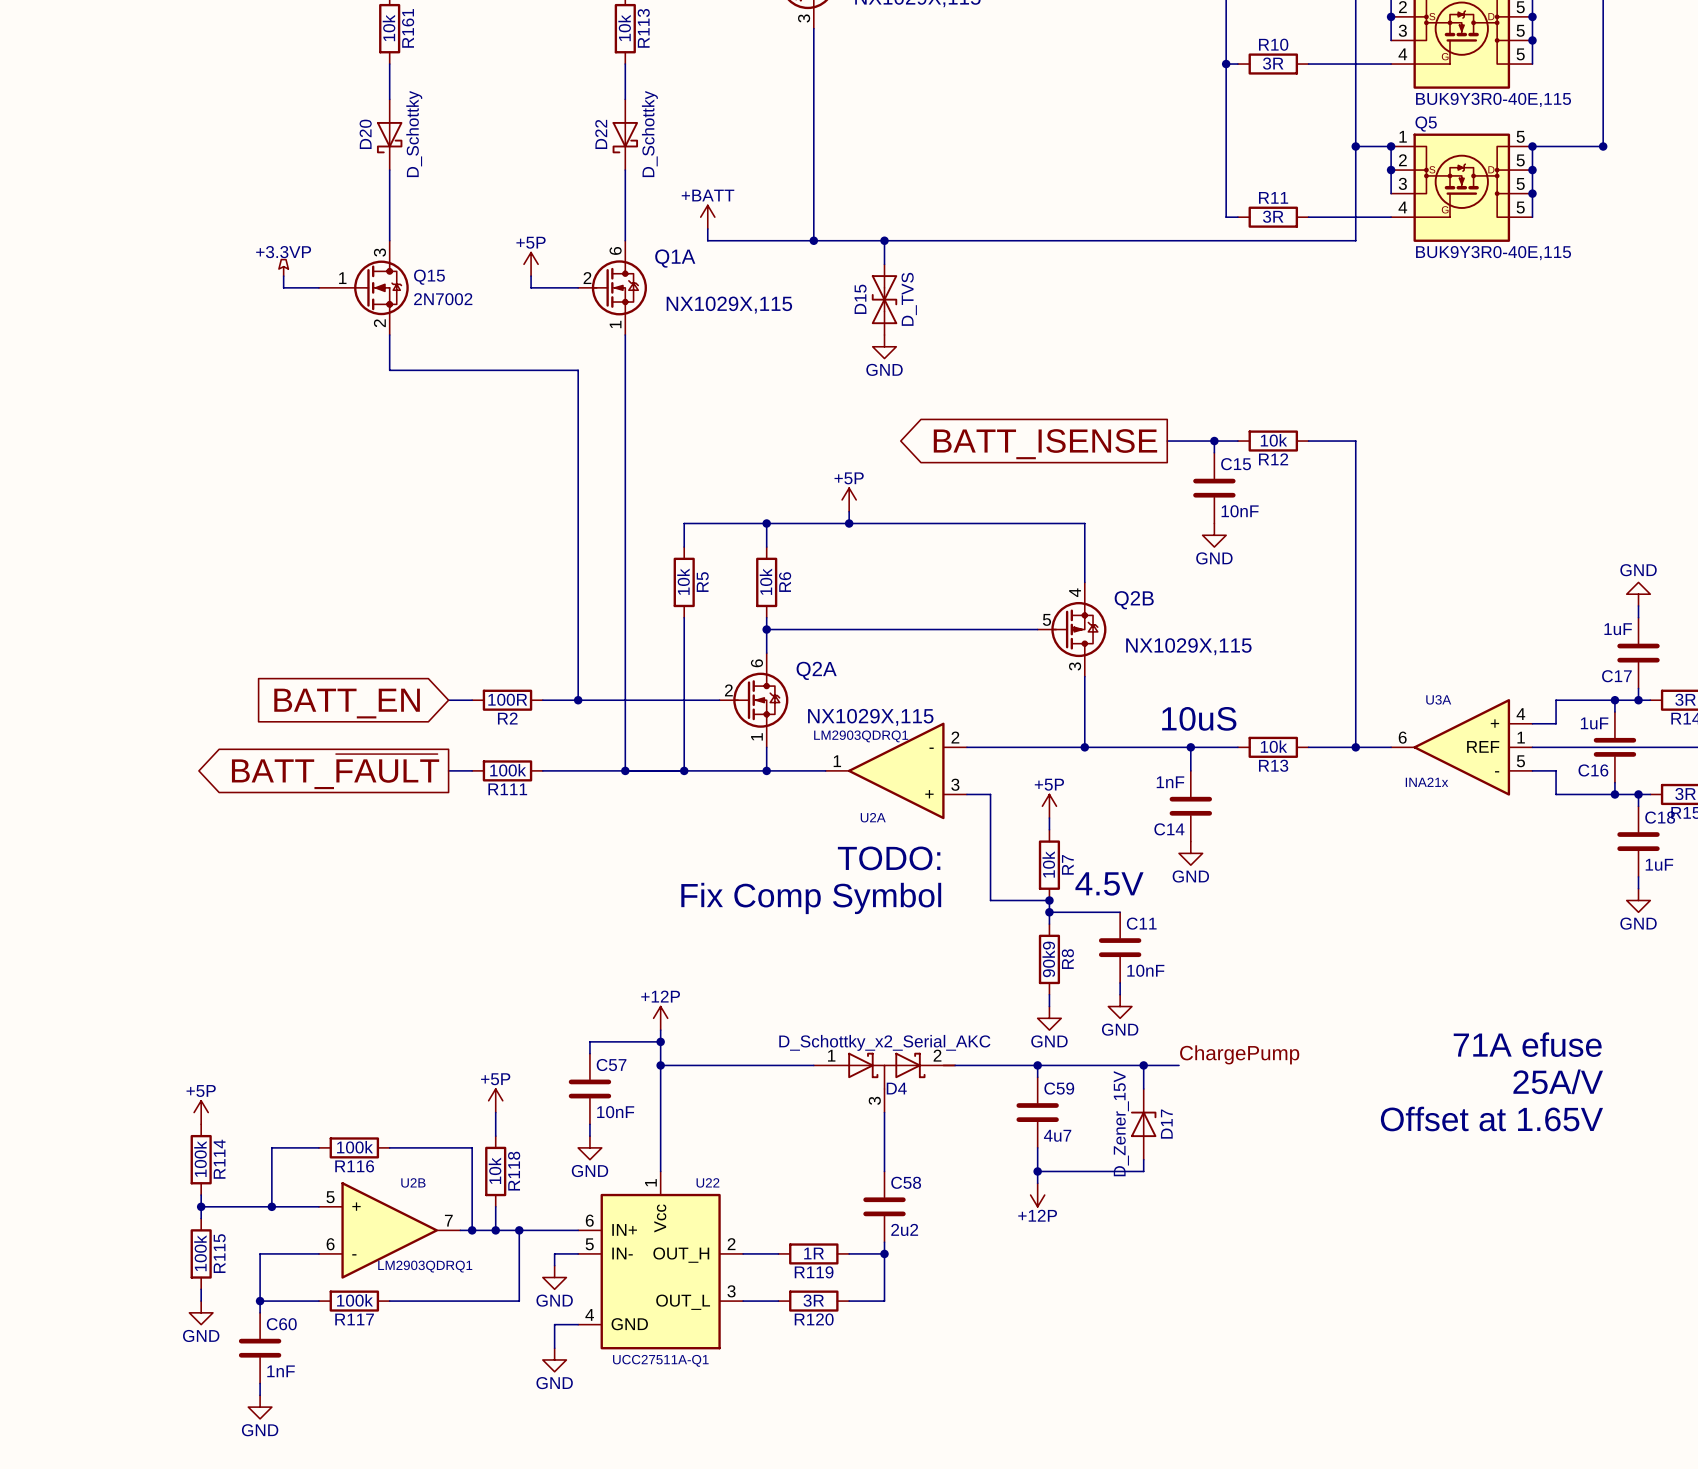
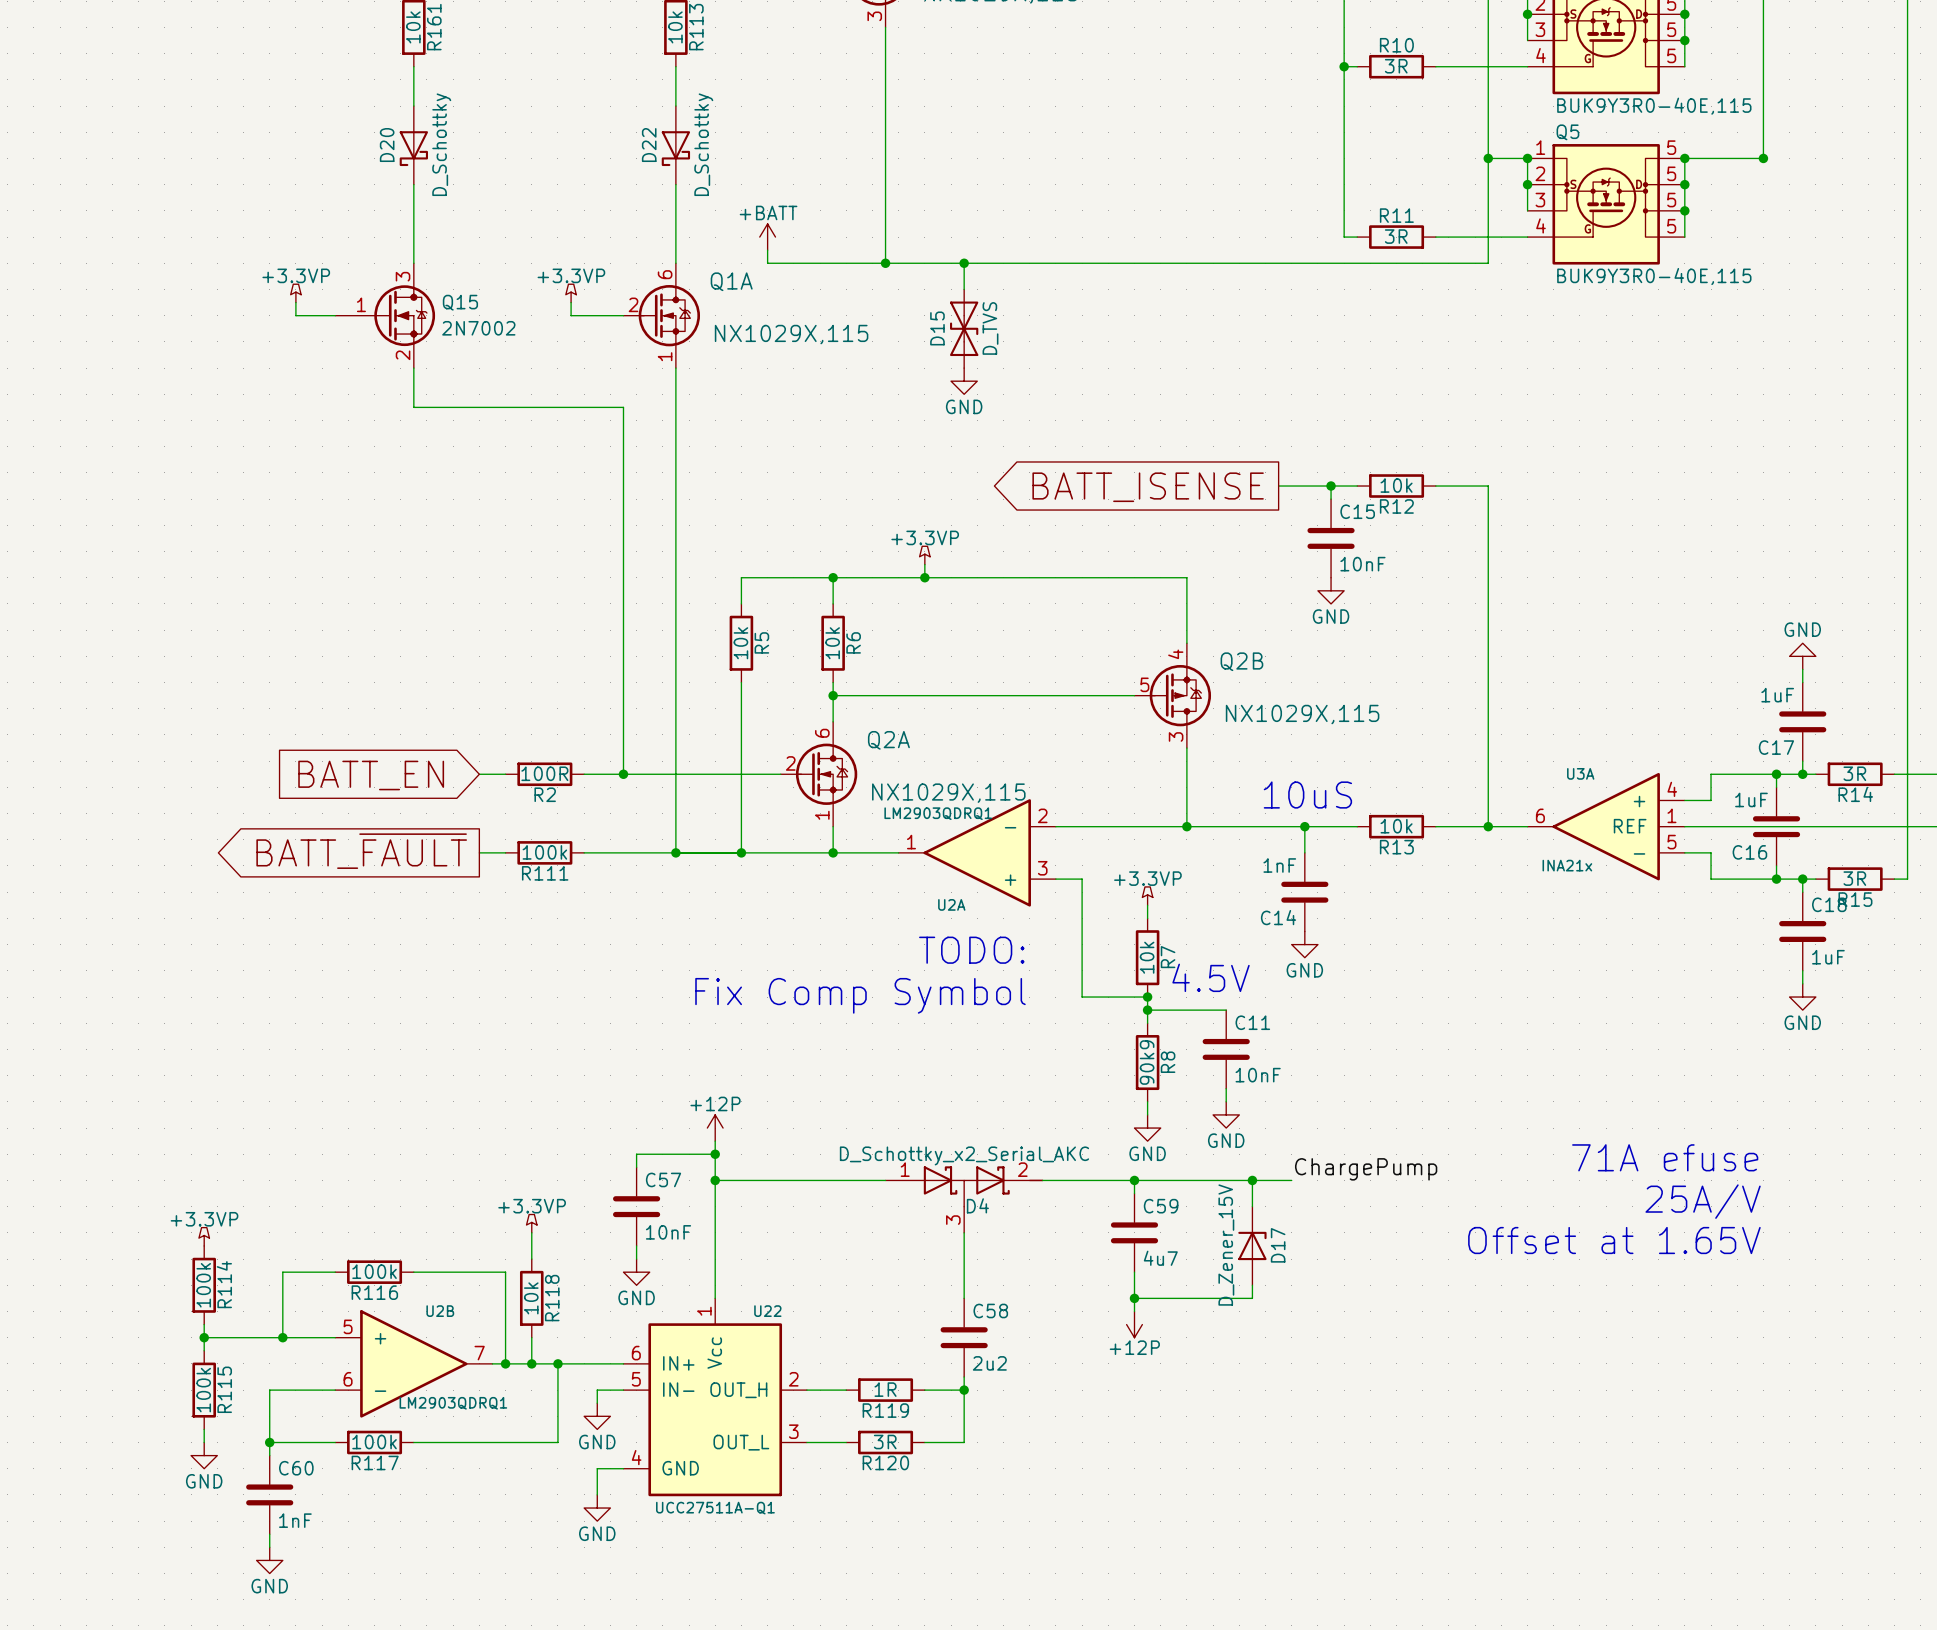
power symbol: +5P (531, 264) -> +3.3VP (571, 293)
power symbol: +5P (849, 499) -> +3.3VP (924, 555)
power symbol: +5P (1049, 806) -> +3.3VP (1147, 896)
power symbol: +5P (495, 1100) -> +3.3VP (531, 1223)
power symbol: +5P (201, 1112) -> +3.3VP (204, 1236)

